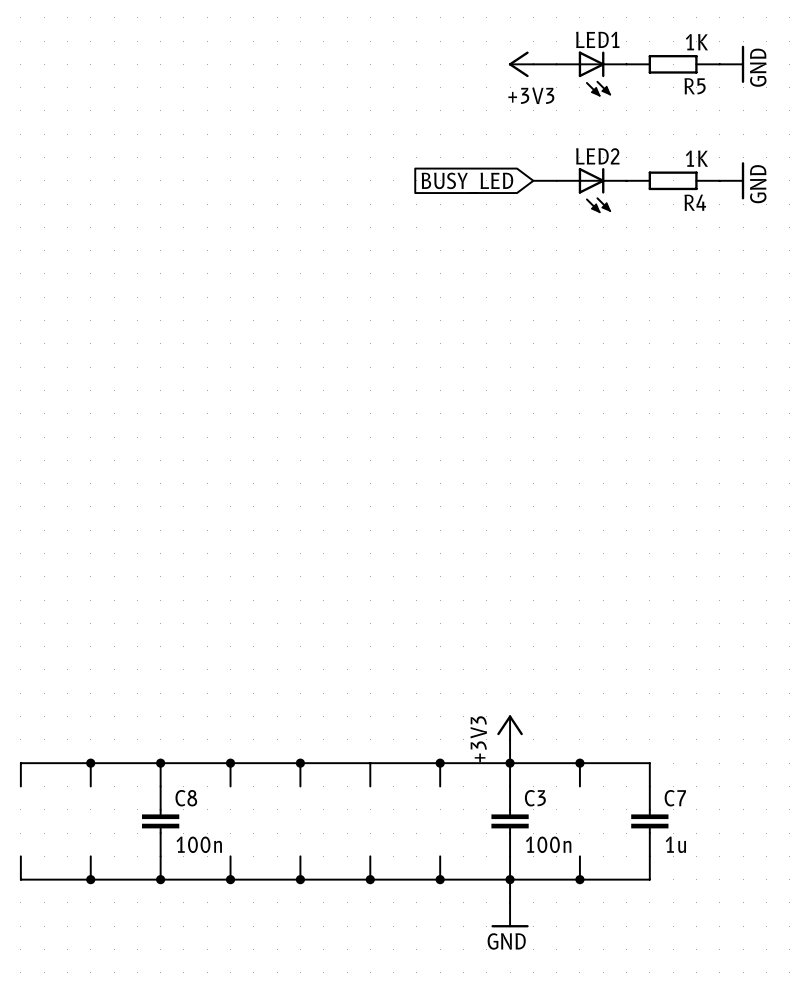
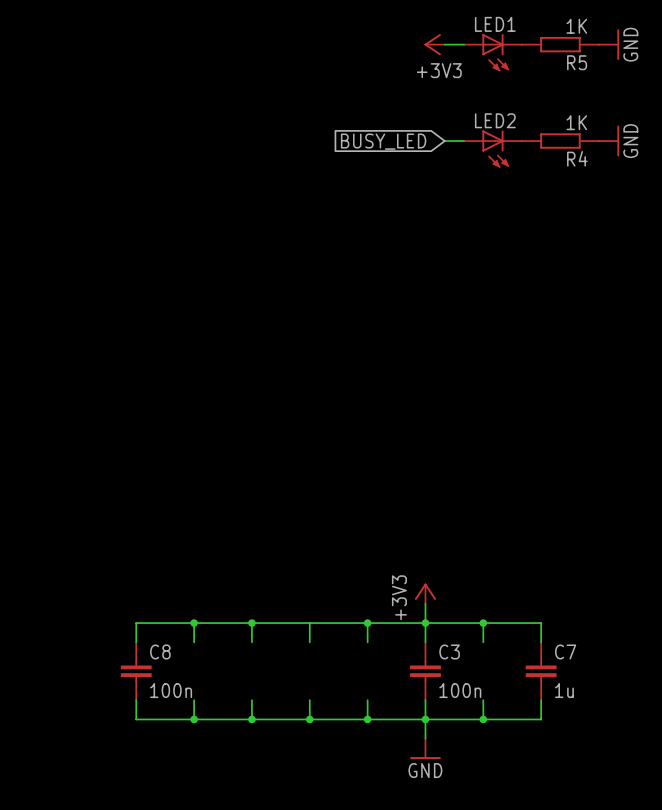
wire: (90, 763) (90, 786) -> none
junction: (90, 763) -> none
wire: (160, 763) (20, 763) (20, 786) -> none
junction: (160, 763) -> none
wire: (20, 856) (20, 879) (160, 879) -> none
wire: (90, 856) (90, 879) -> none
junction: (90, 879) -> none
junction: (160, 879) -> none

